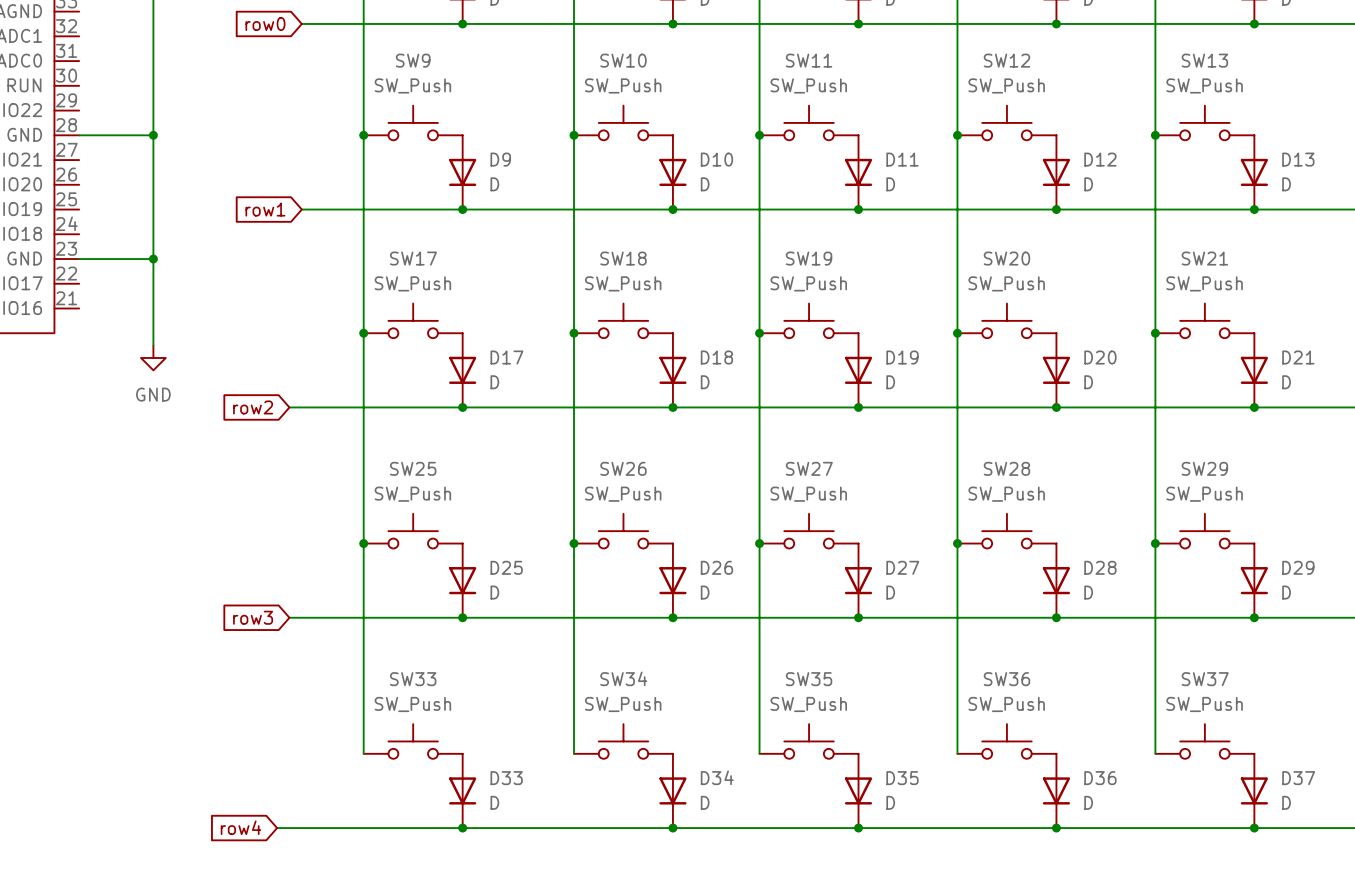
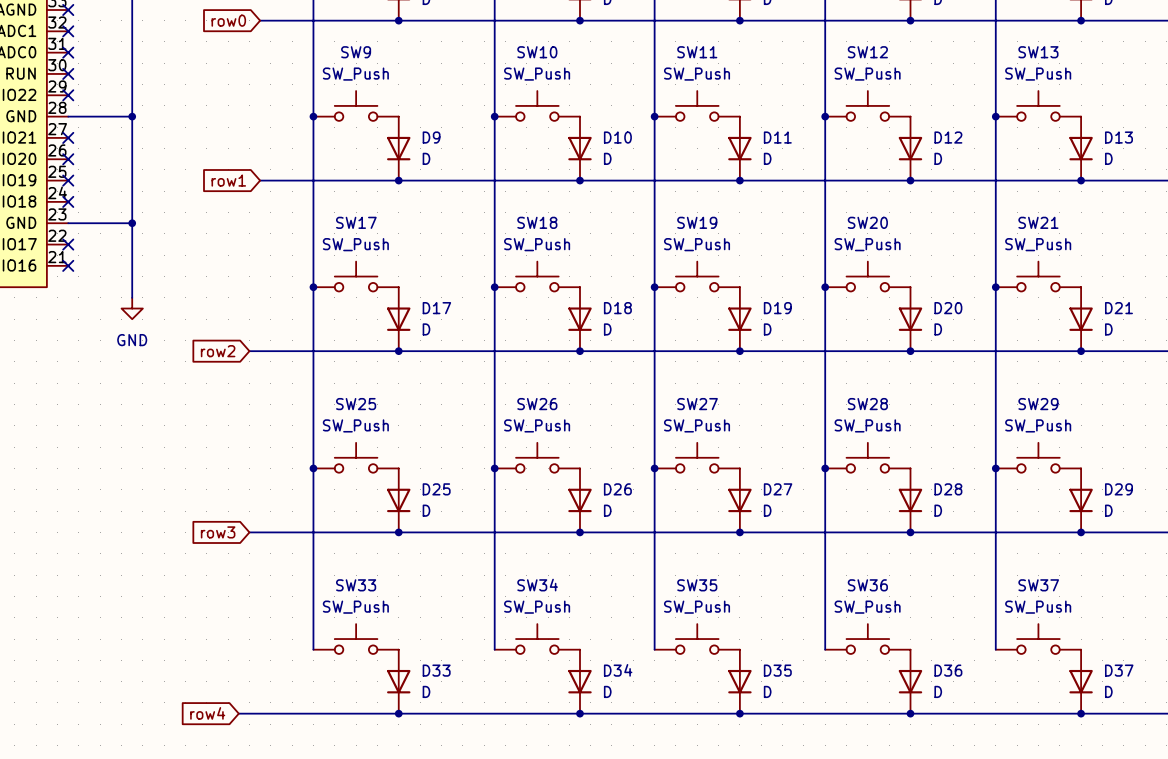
no-connect mark: none -> (68, 10)
no-connect mark: none -> (68, 31)
no-connect mark: none -> (68, 52)
no-connect mark: none -> (68, 73)
no-connect mark: none -> (68, 95)
no-connect mark: none -> (68, 137)
no-connect mark: none -> (68, 159)
no-connect mark: none -> (68, 180)
no-connect mark: none -> (68, 201)
no-connect mark: none -> (68, 244)
no-connect mark: none -> (68, 265)

